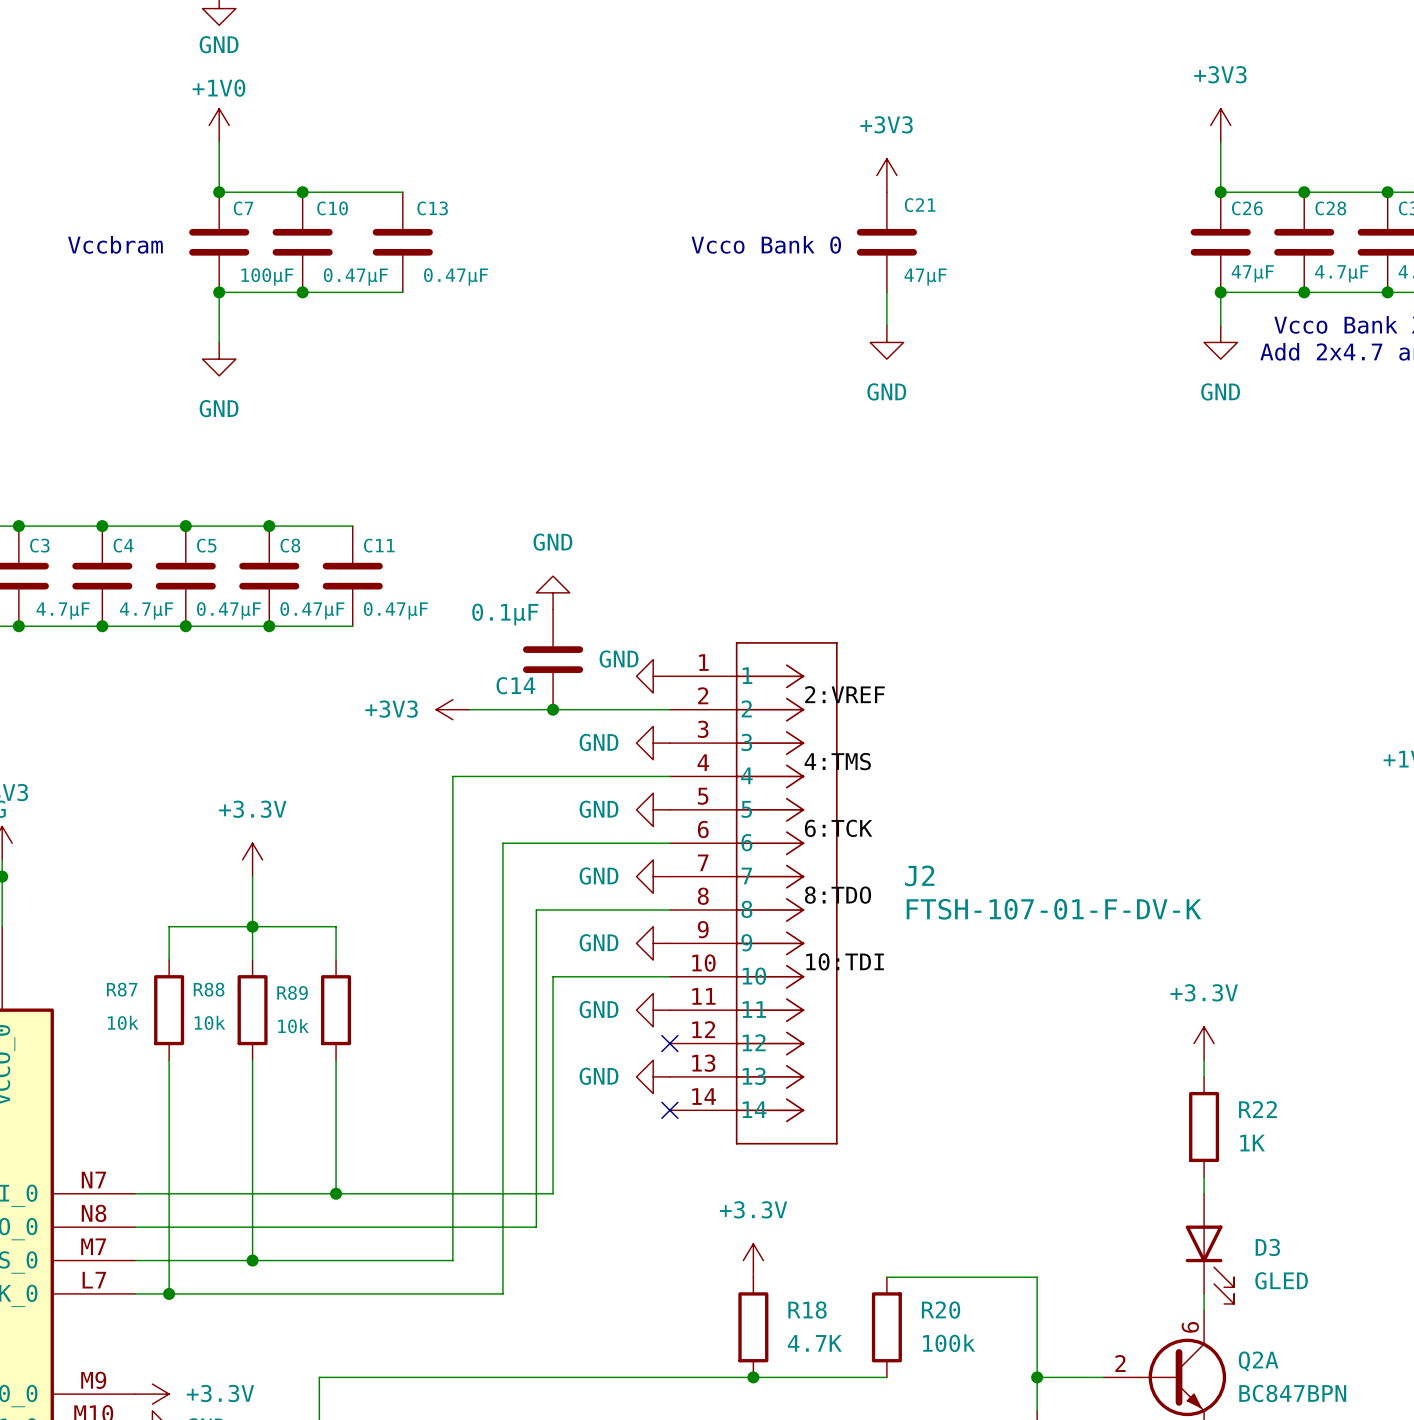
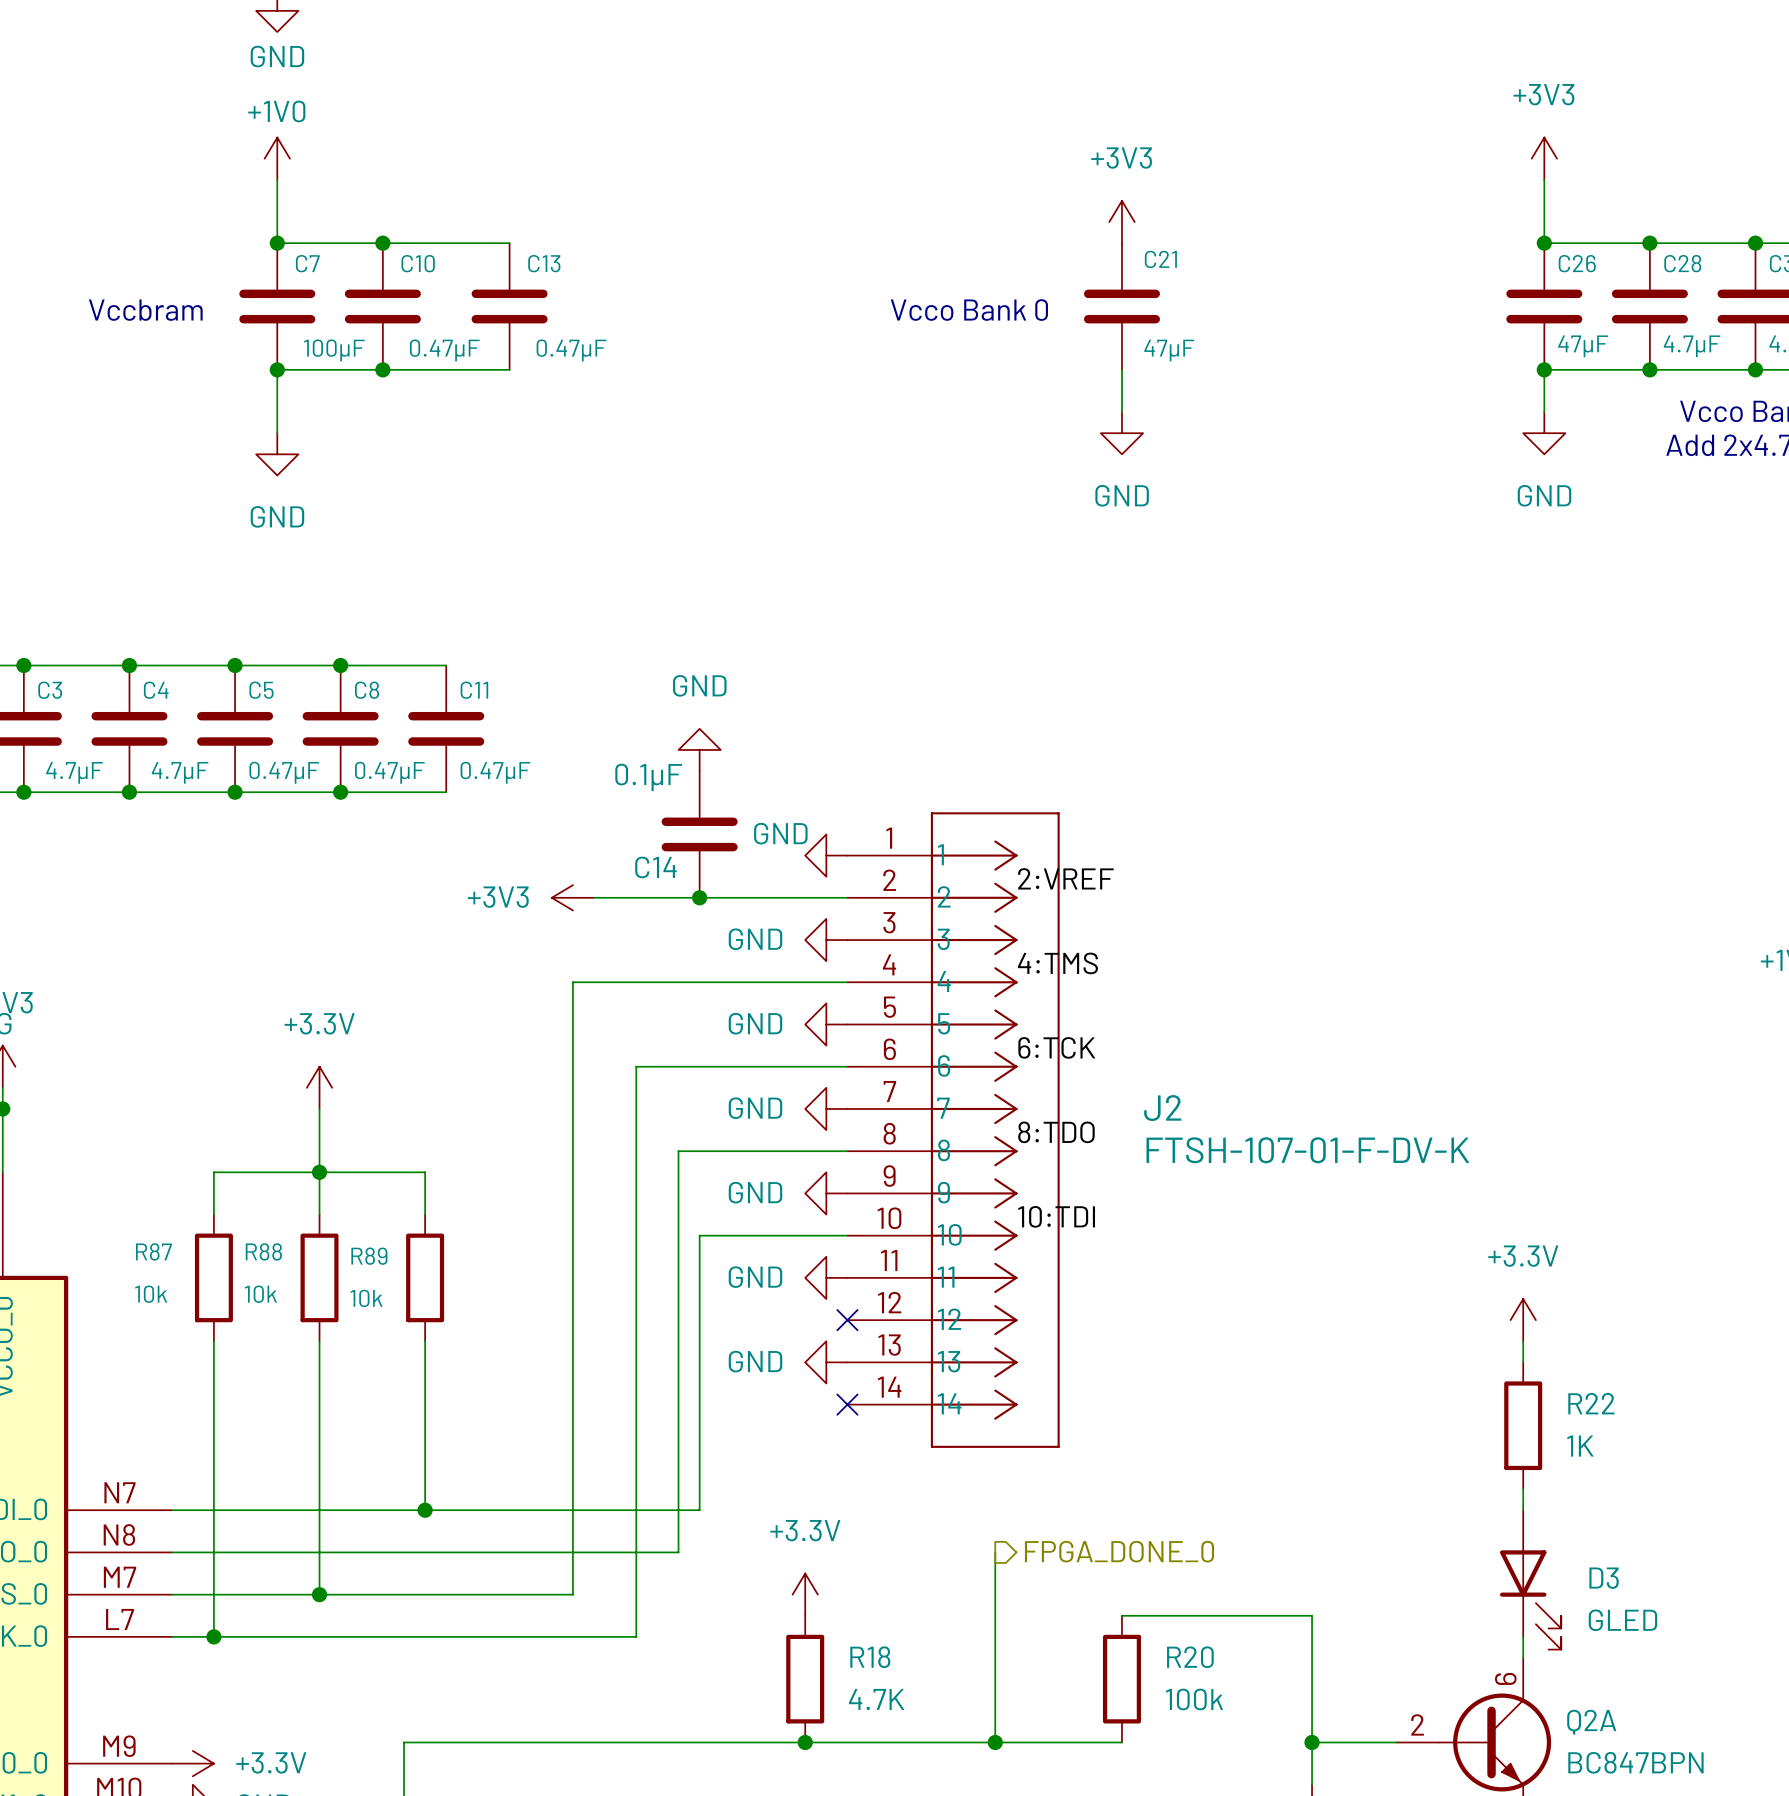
wire: none -> (995, 1552) (995, 1742)
hierarchical label: none -> FPGA_DONE_0 (1119, 1551)
power symbol position: +3.3V (753, 1260) -> +3.3V (805, 1594)
R18 position: (753, 1327) -> (805, 1679)
junction: none -> (805, 1742)
junction position: (753, 1377) -> (995, 1742)

